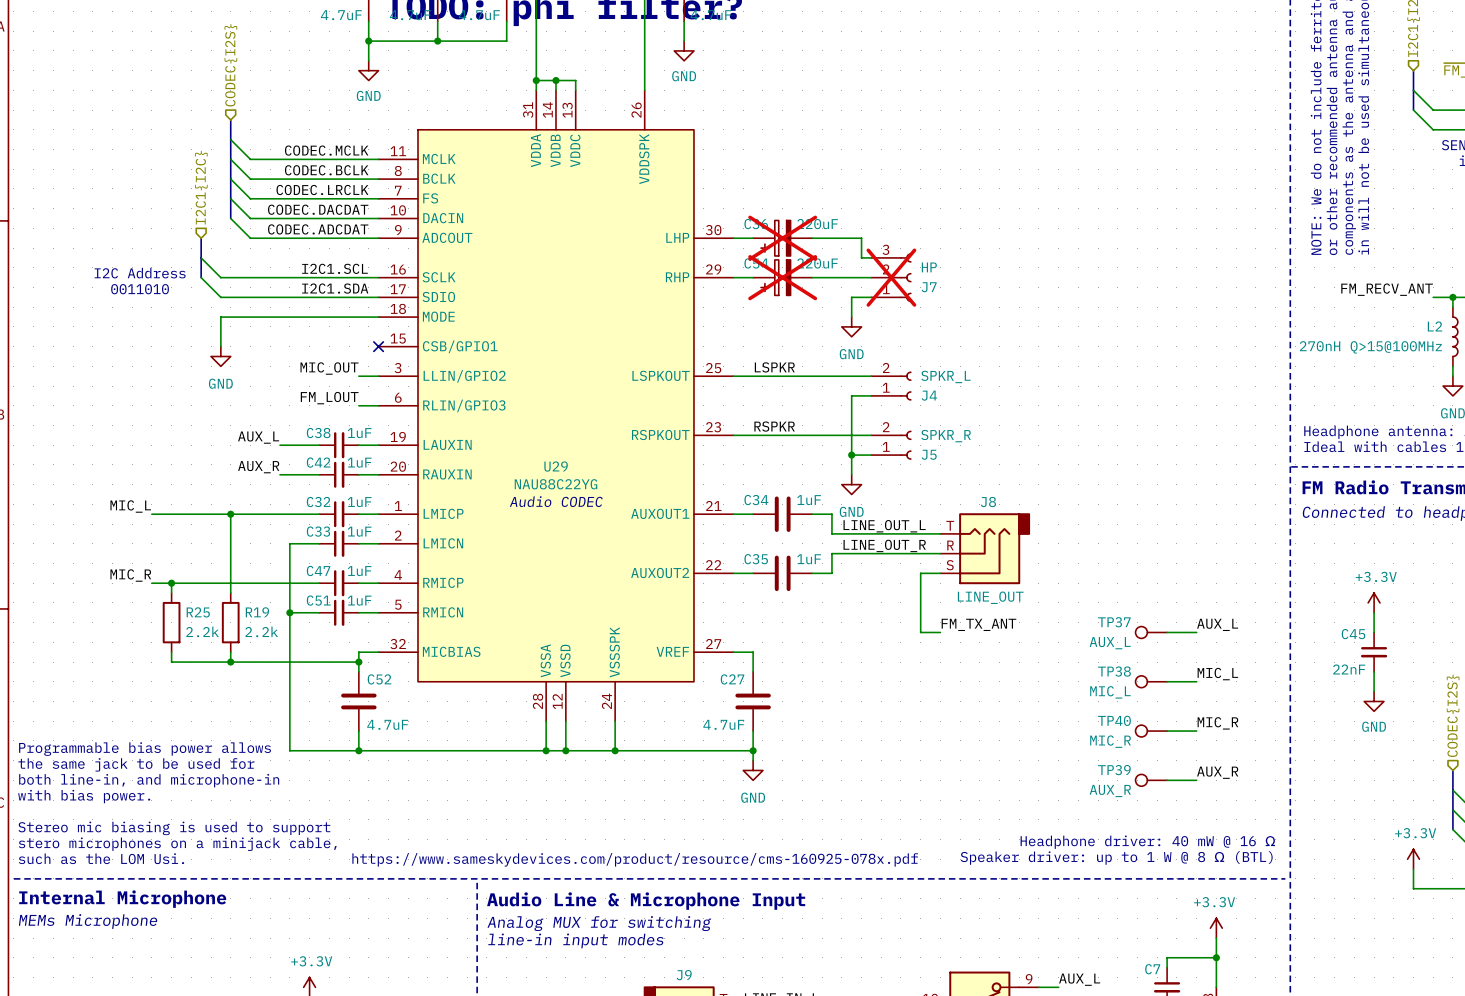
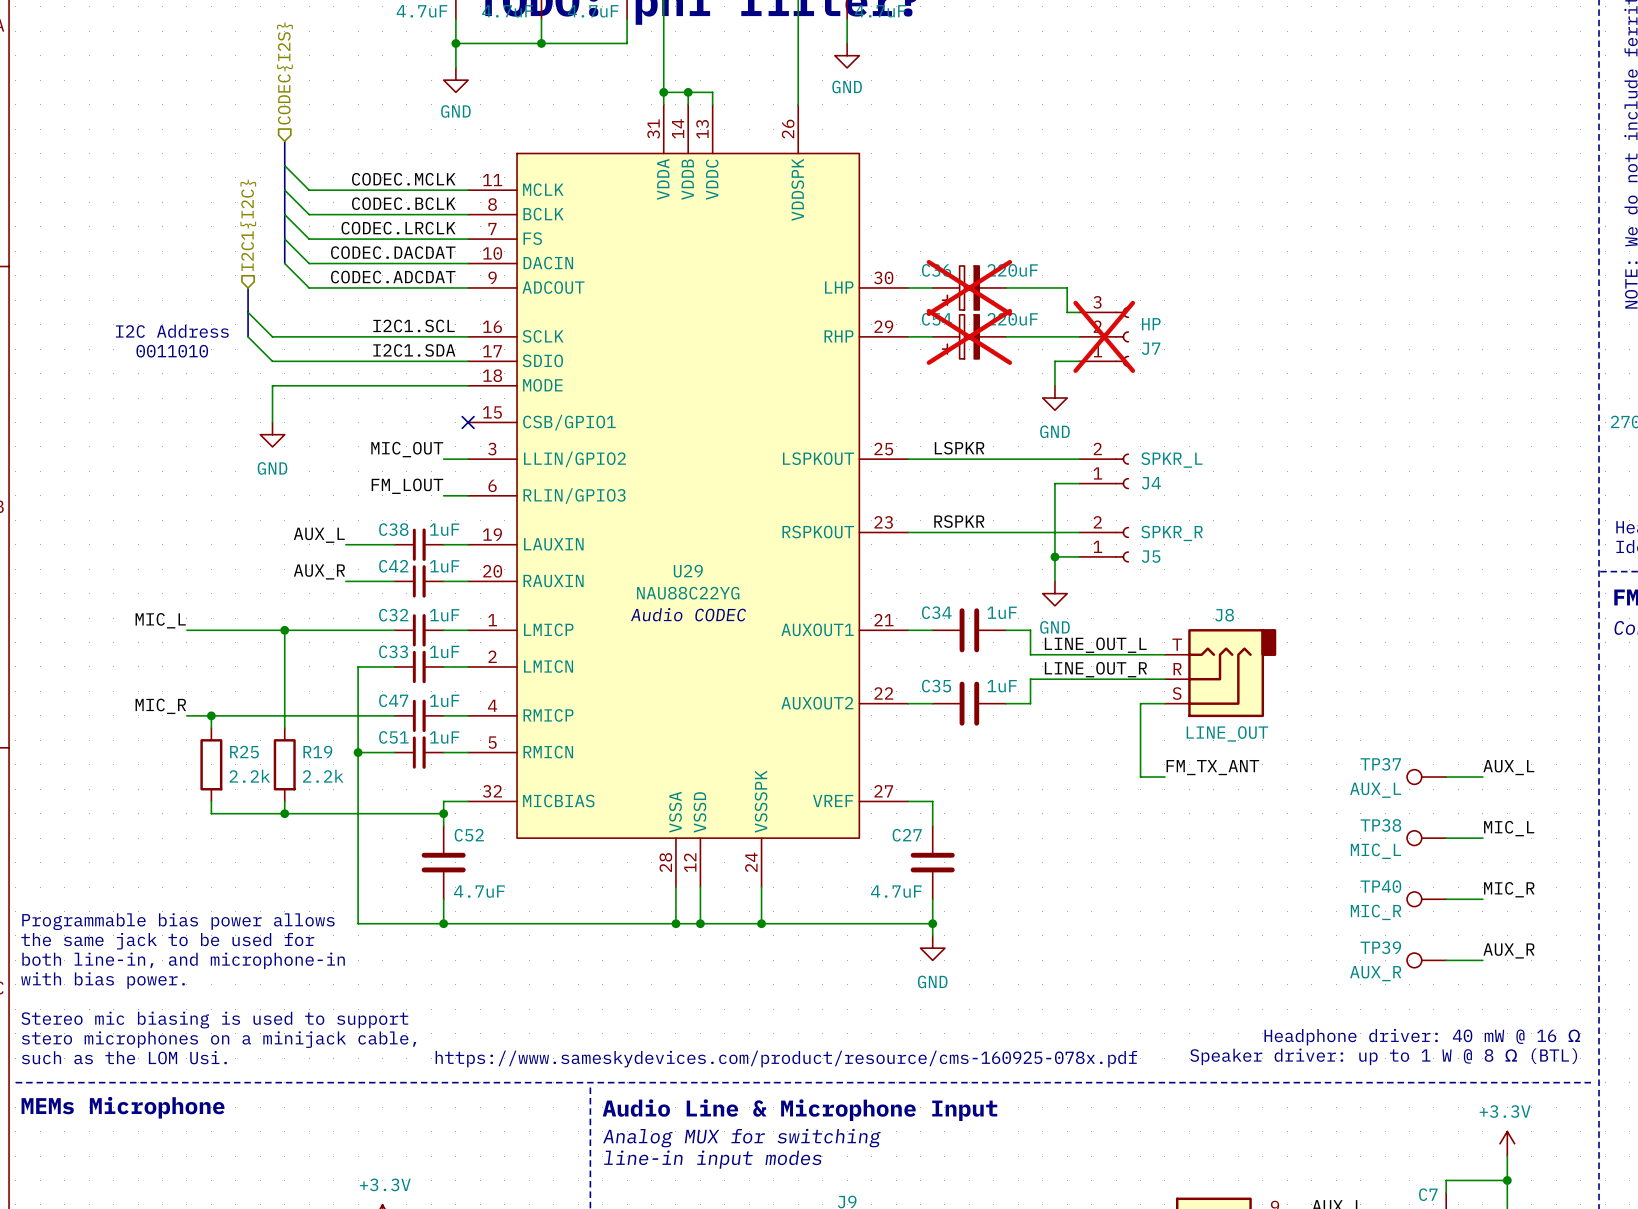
text: Internal Microphone (122, 899) -> MEMs Microphone (123, 1107)
text: MEMs Microphone (88, 921) -> none

